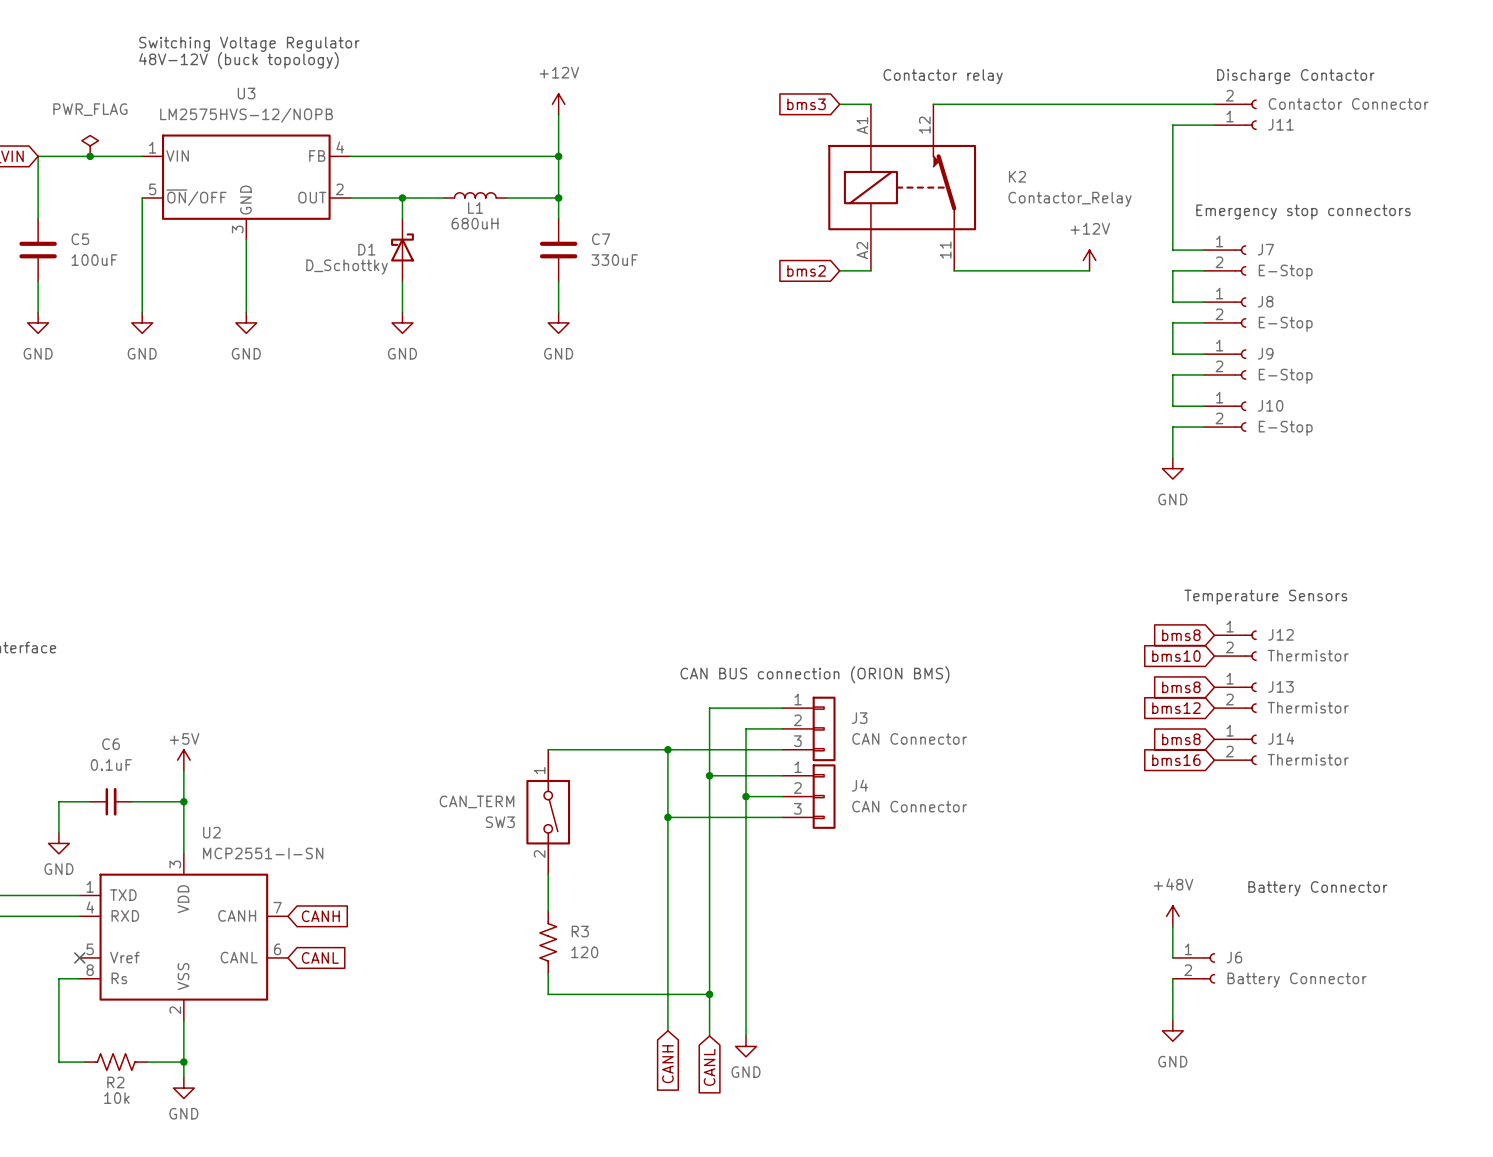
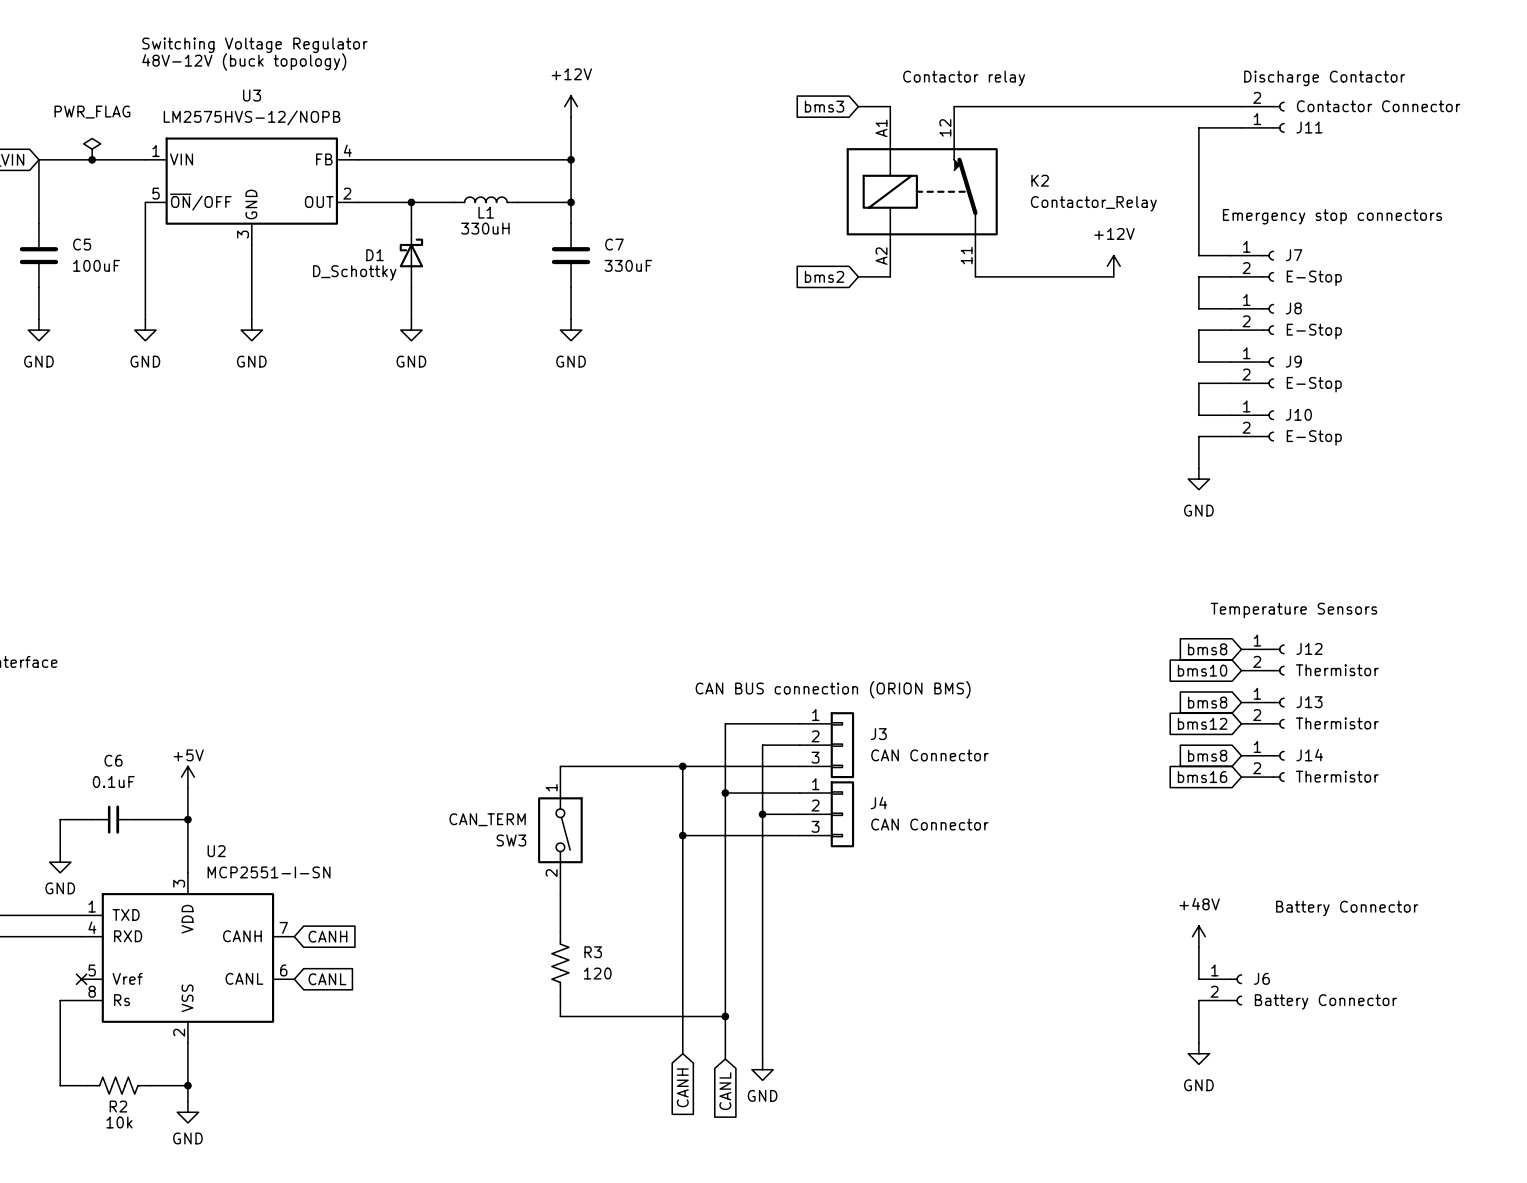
L1 value: 680uH (475, 223) -> 330uH (485, 228)

